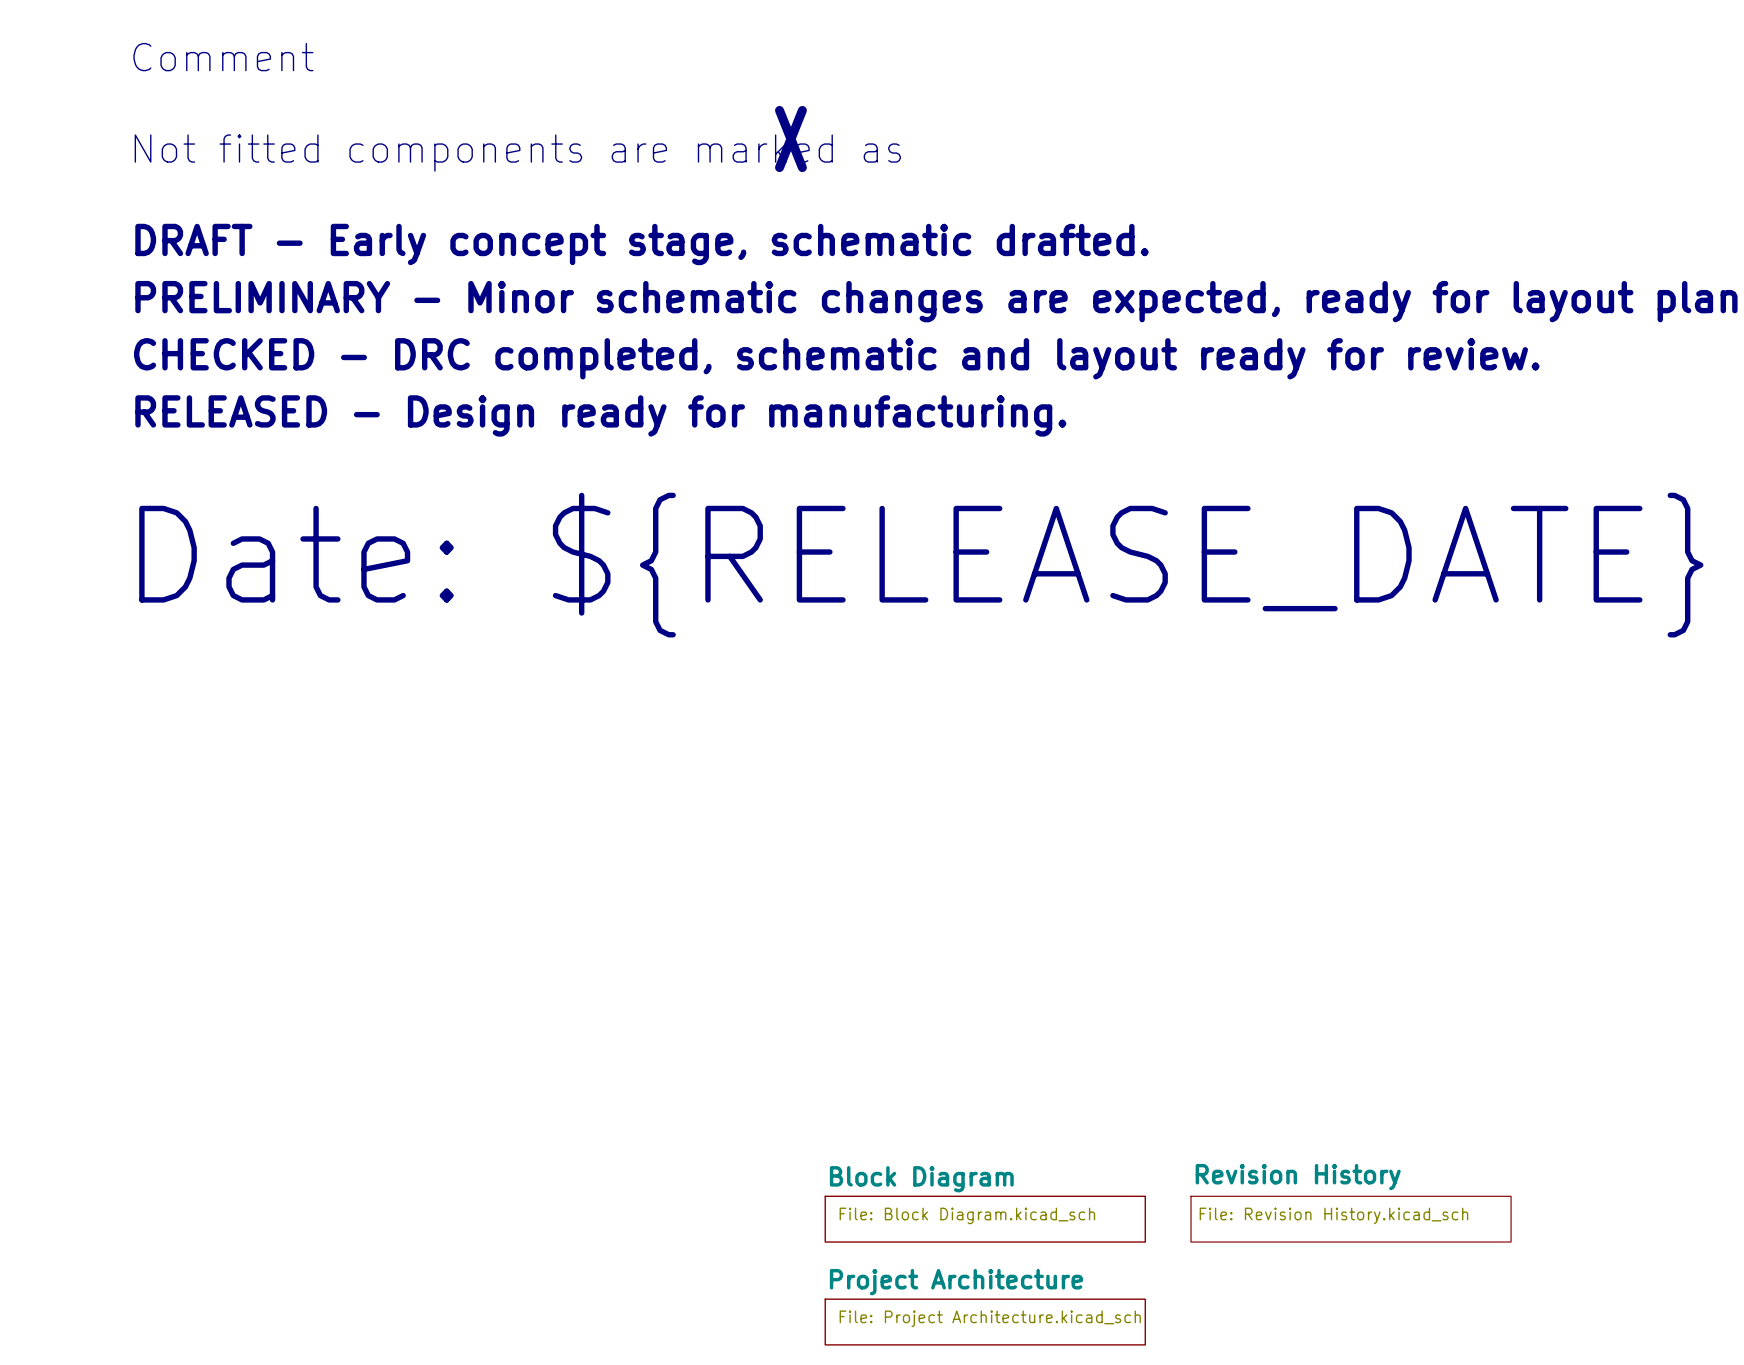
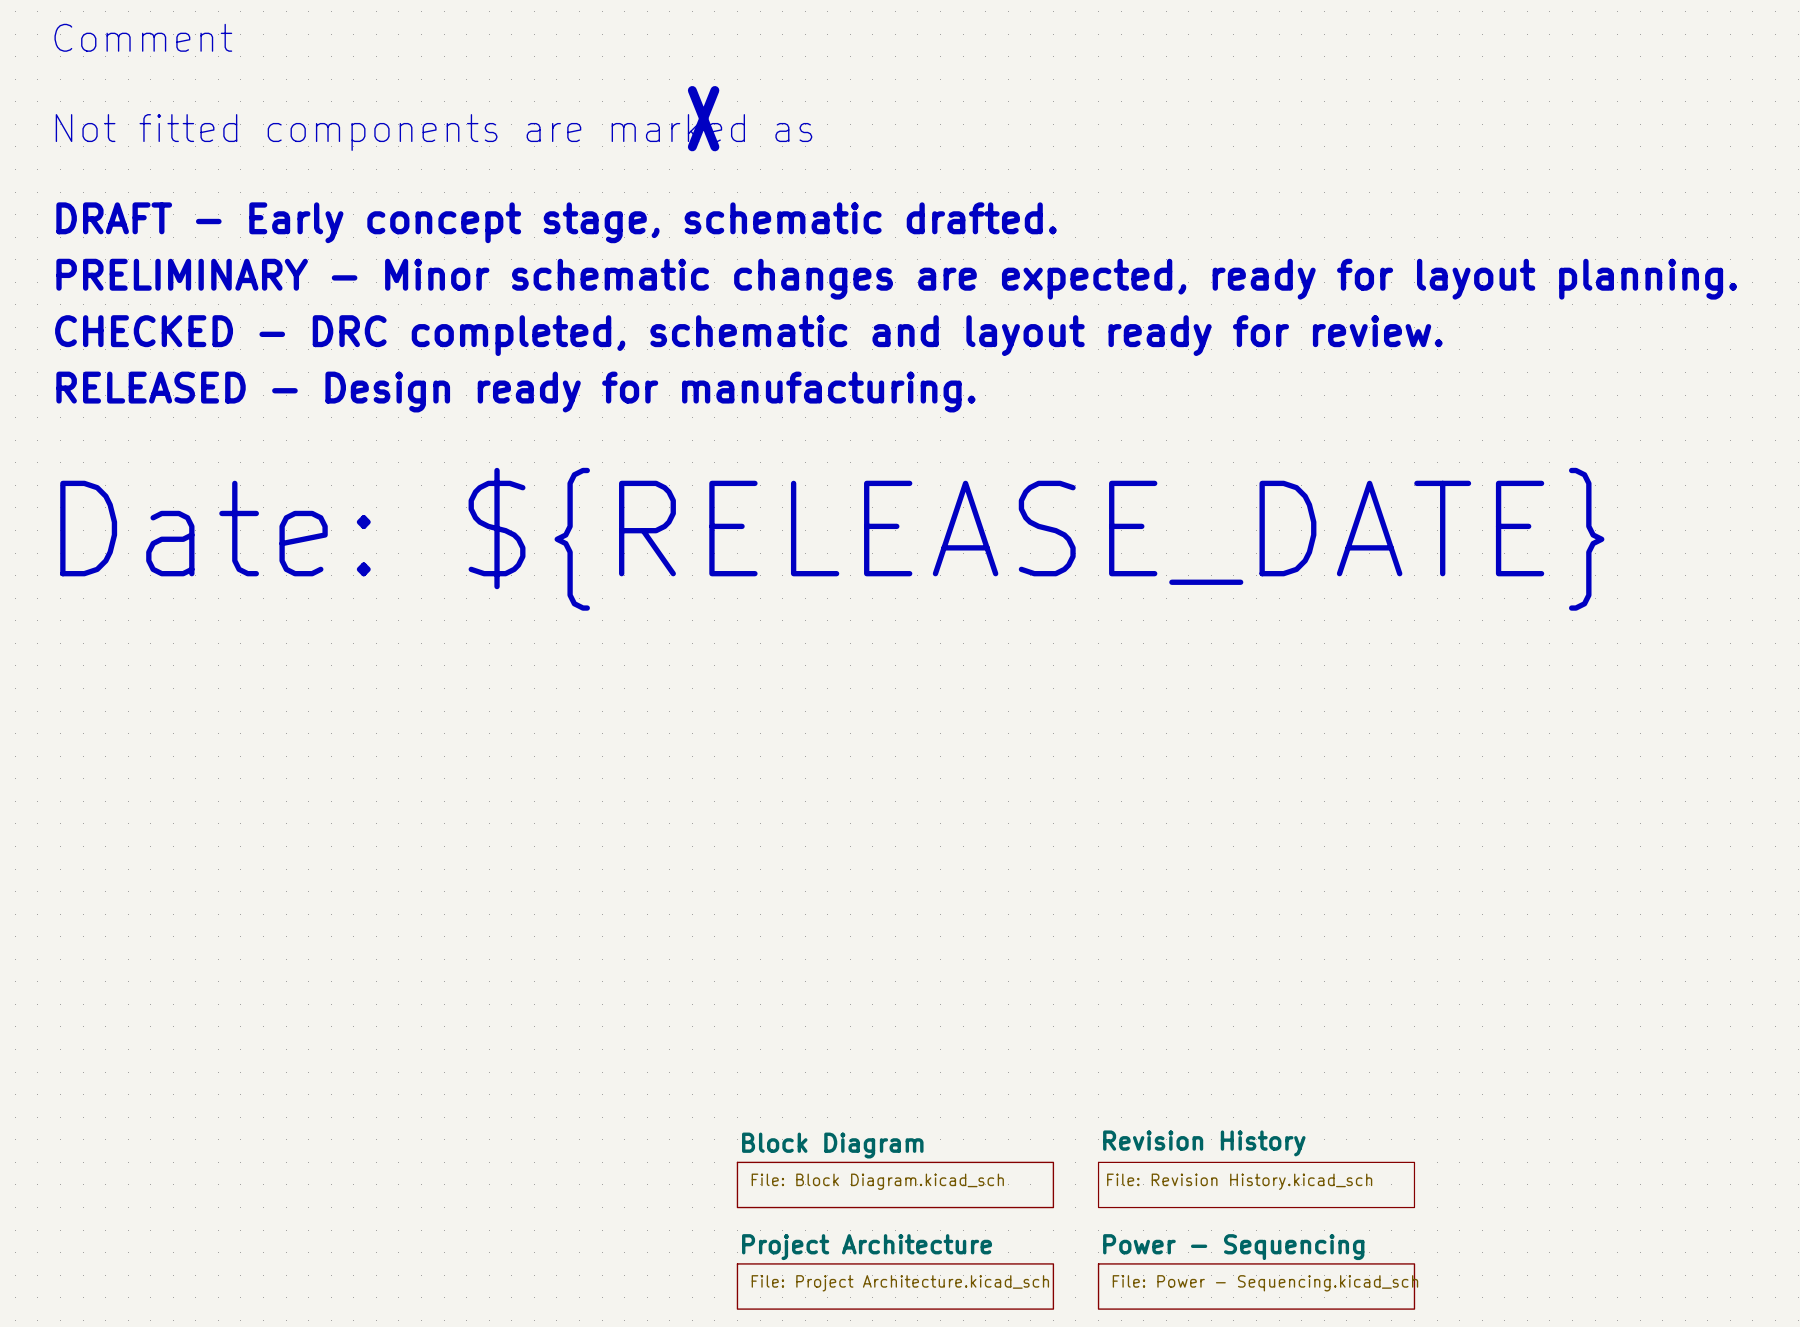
sheet Power - Sequencing: none -> File: Power - Sequencing.kicad_sch (1256, 1286)

